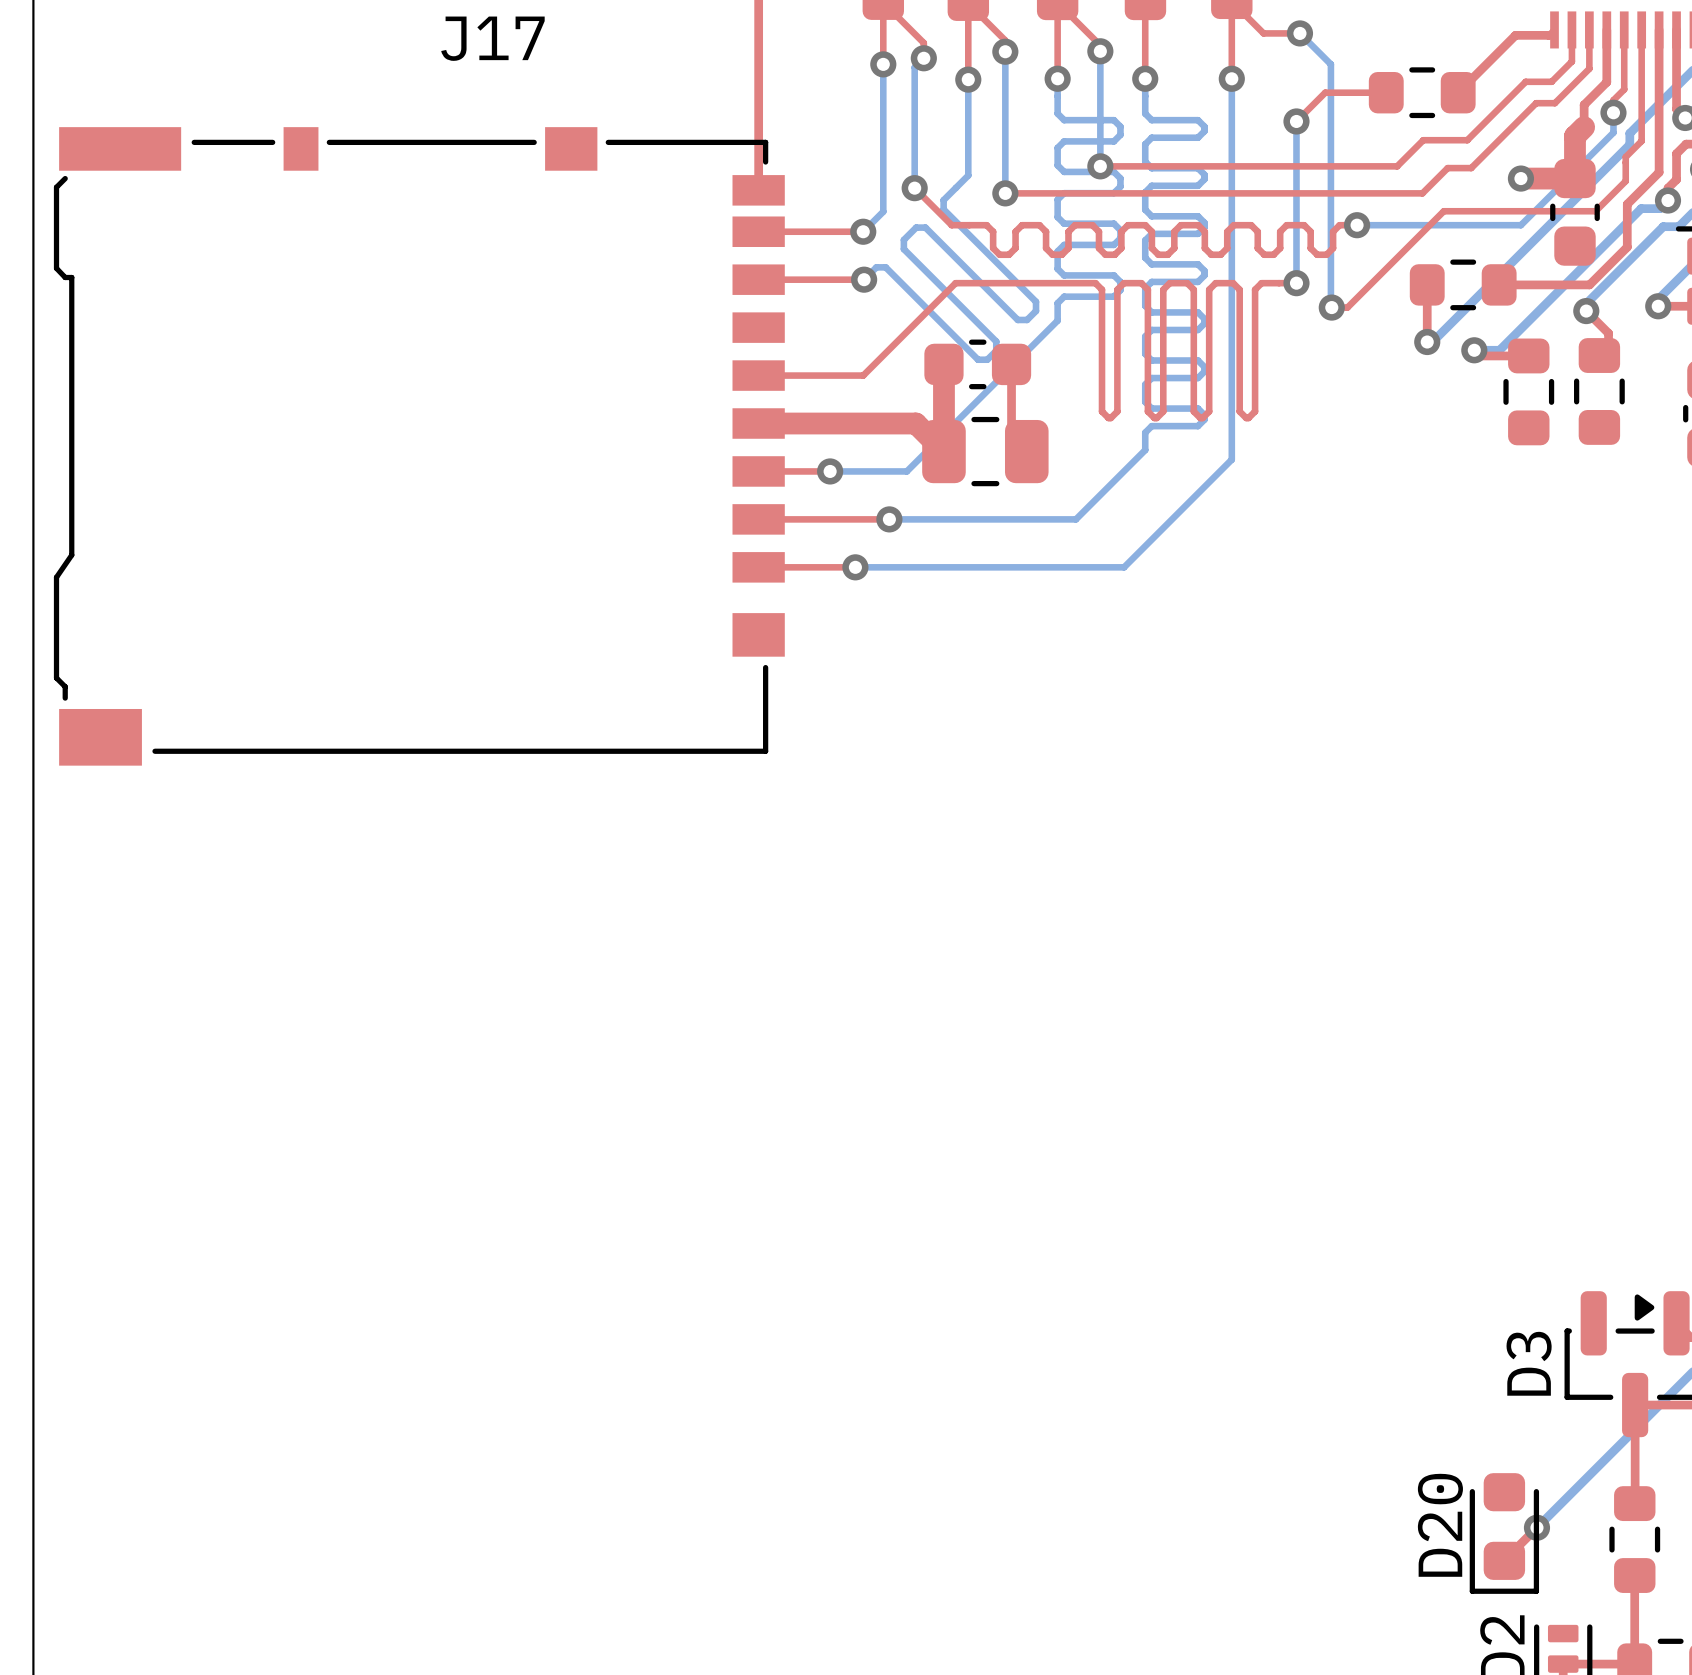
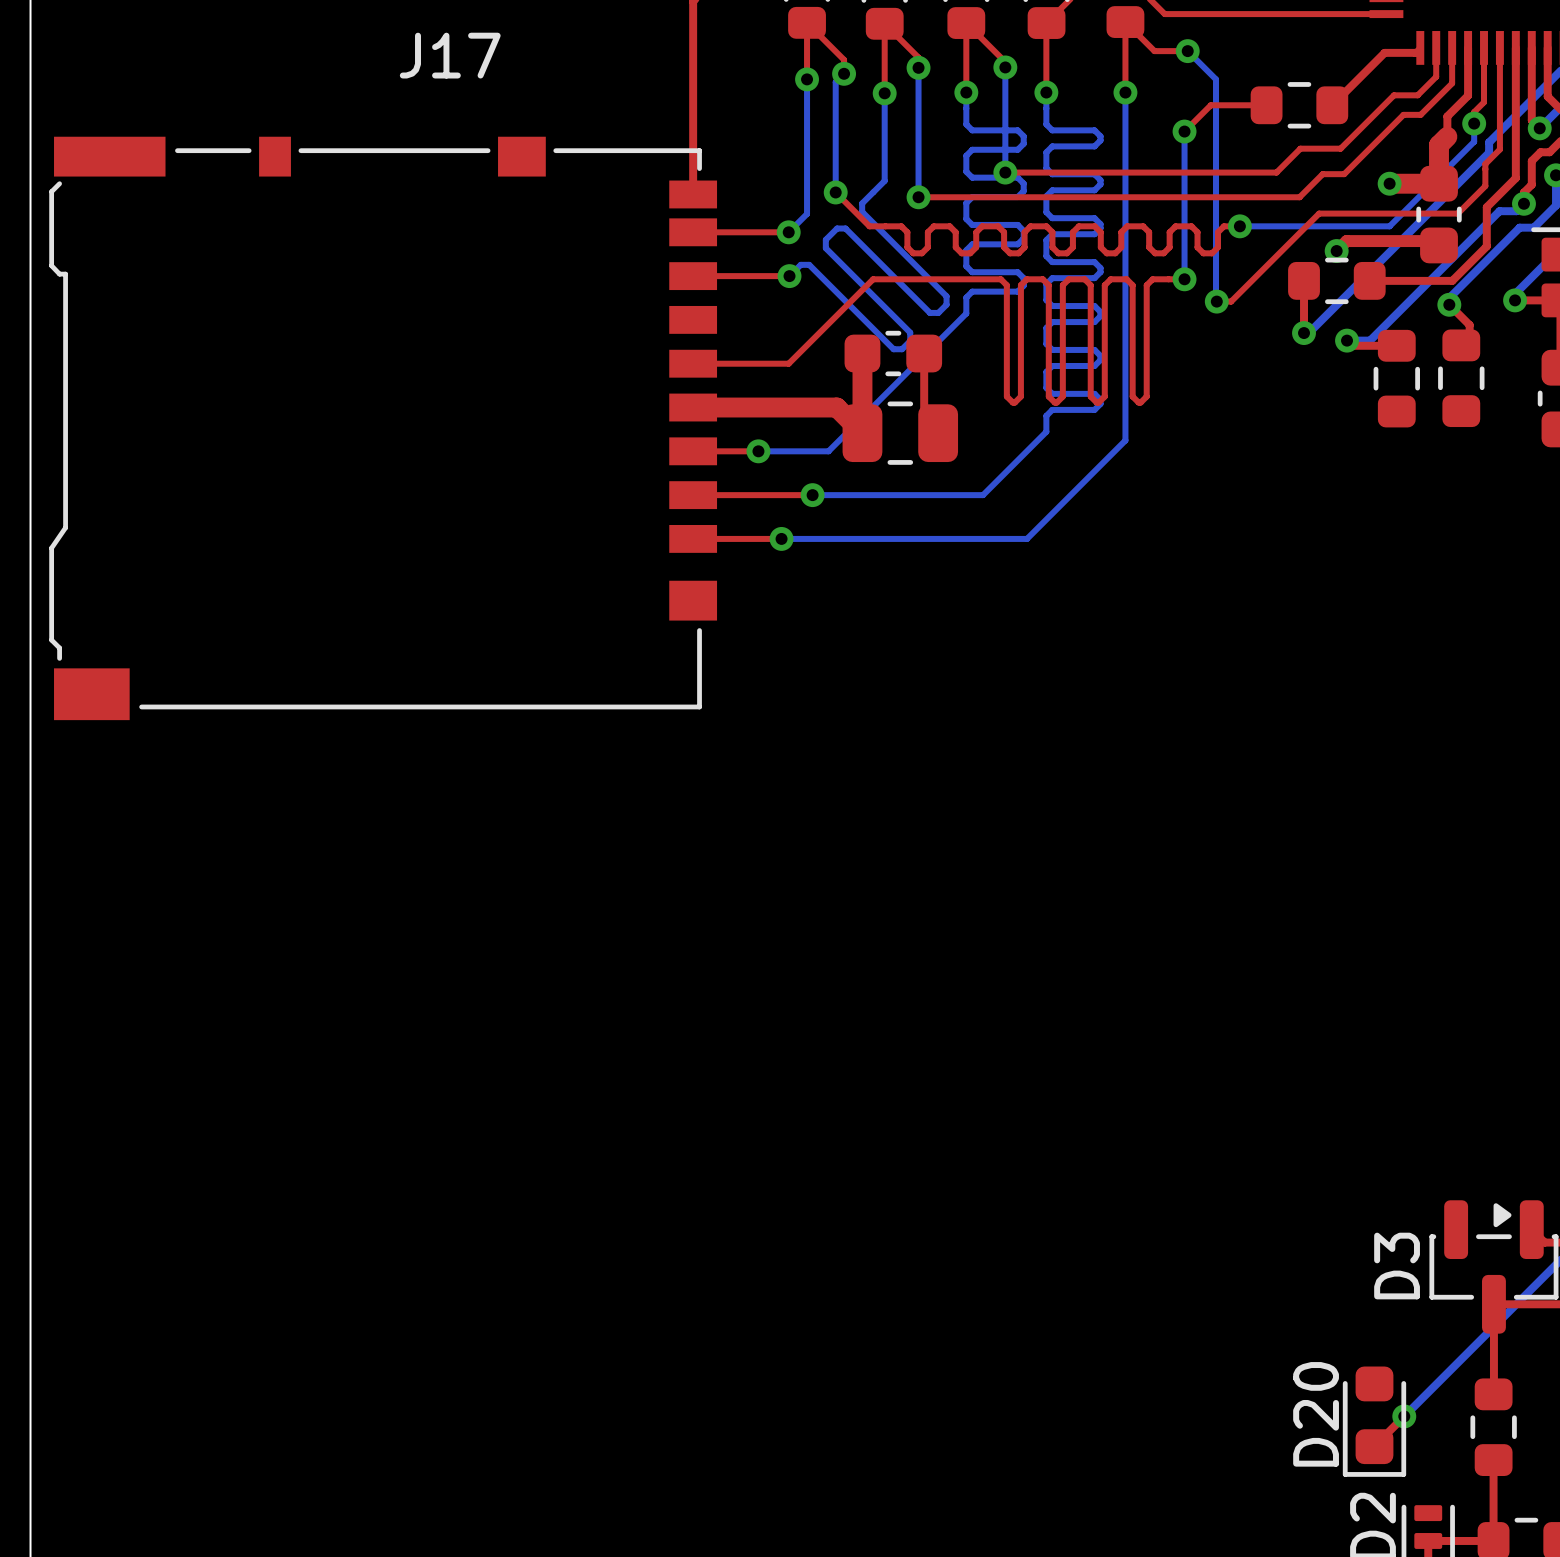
top track: none -> (1439, 245) (1434, 241) (1346, 241) (1336, 251)
via: none -> (1336, 251)

